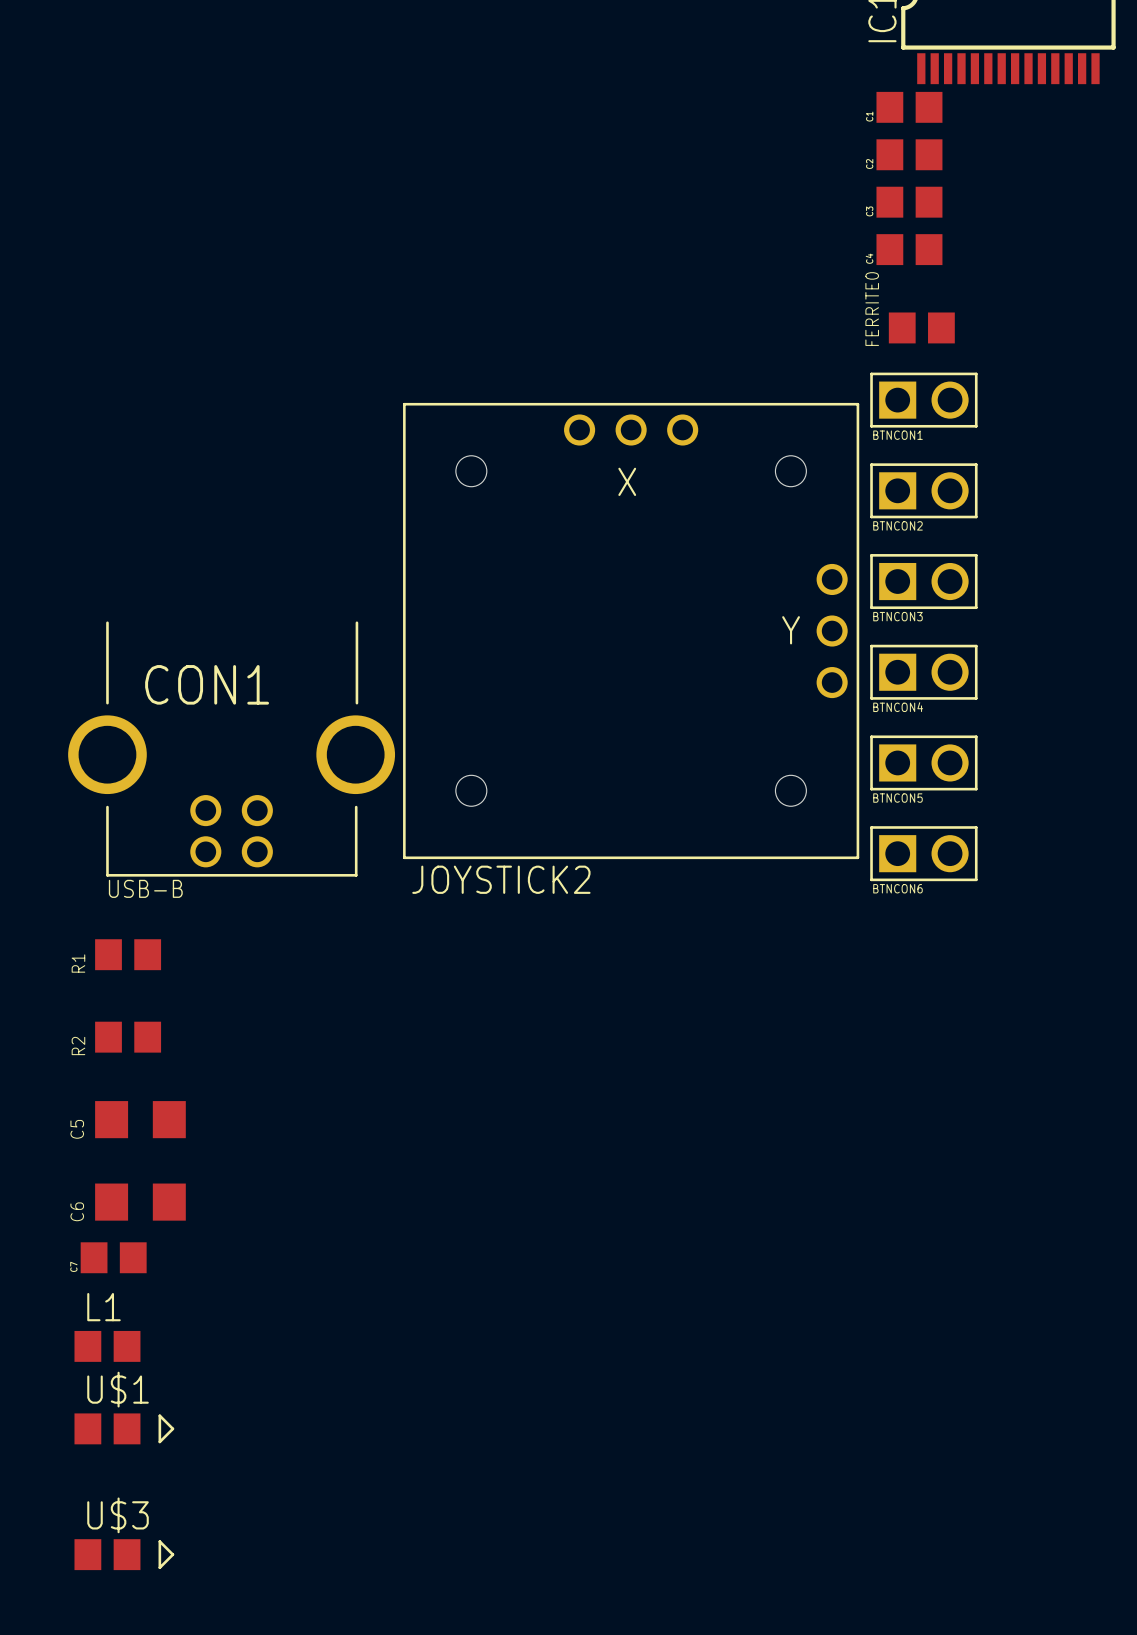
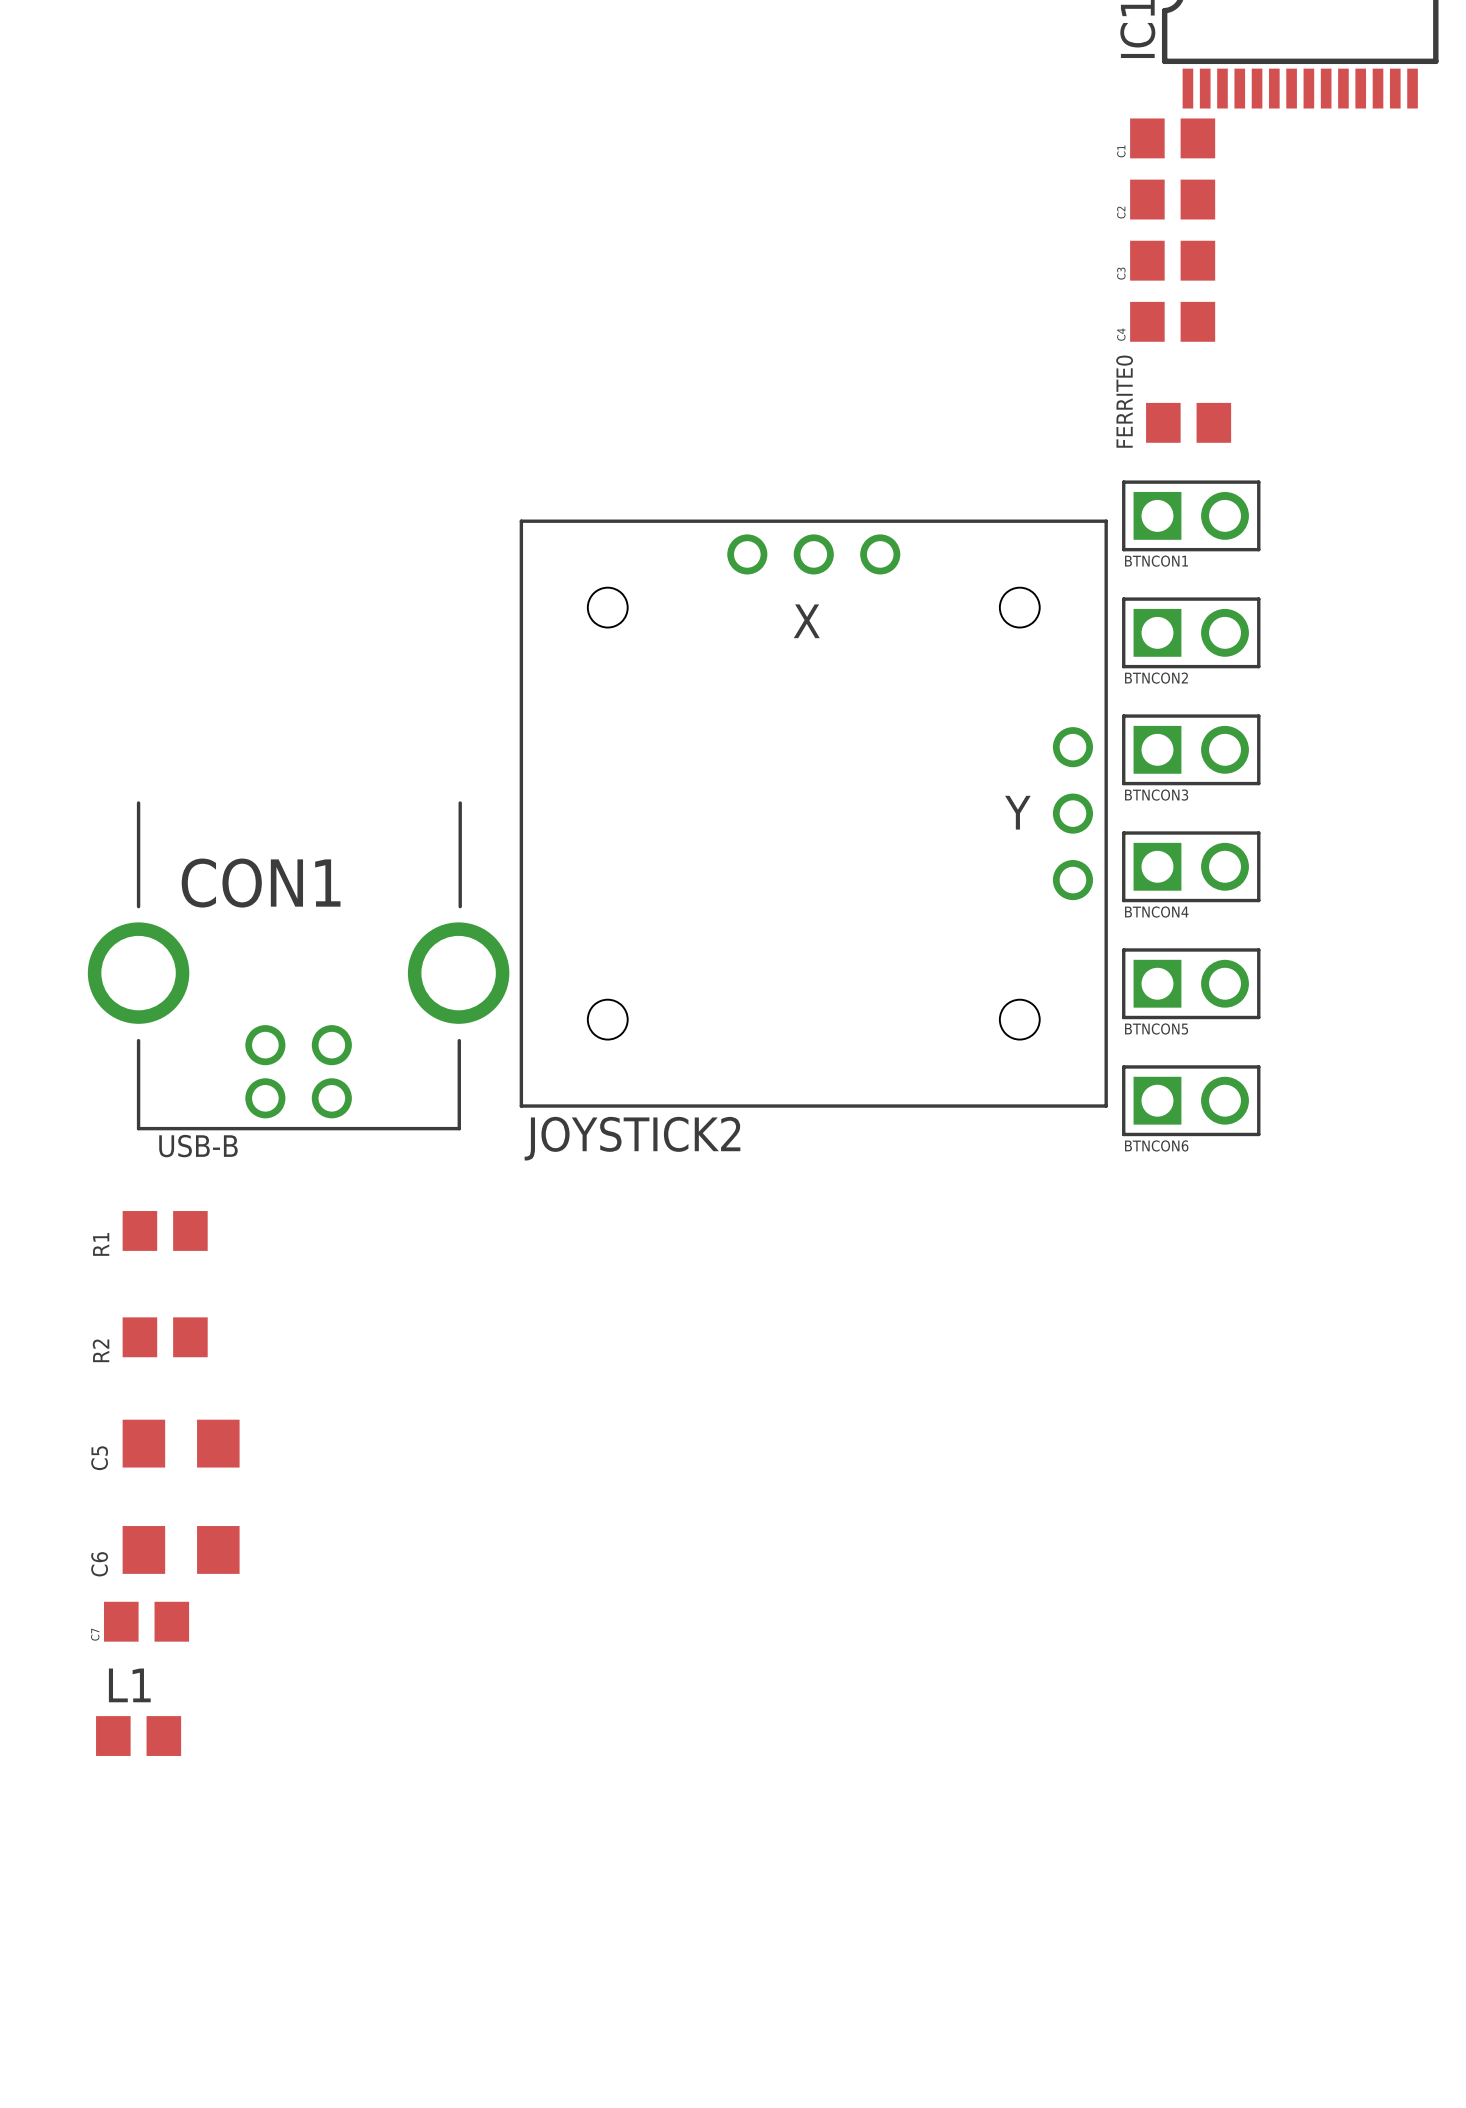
U$1: (124, 1428) -> none
U$3: (124, 1554) -> none

